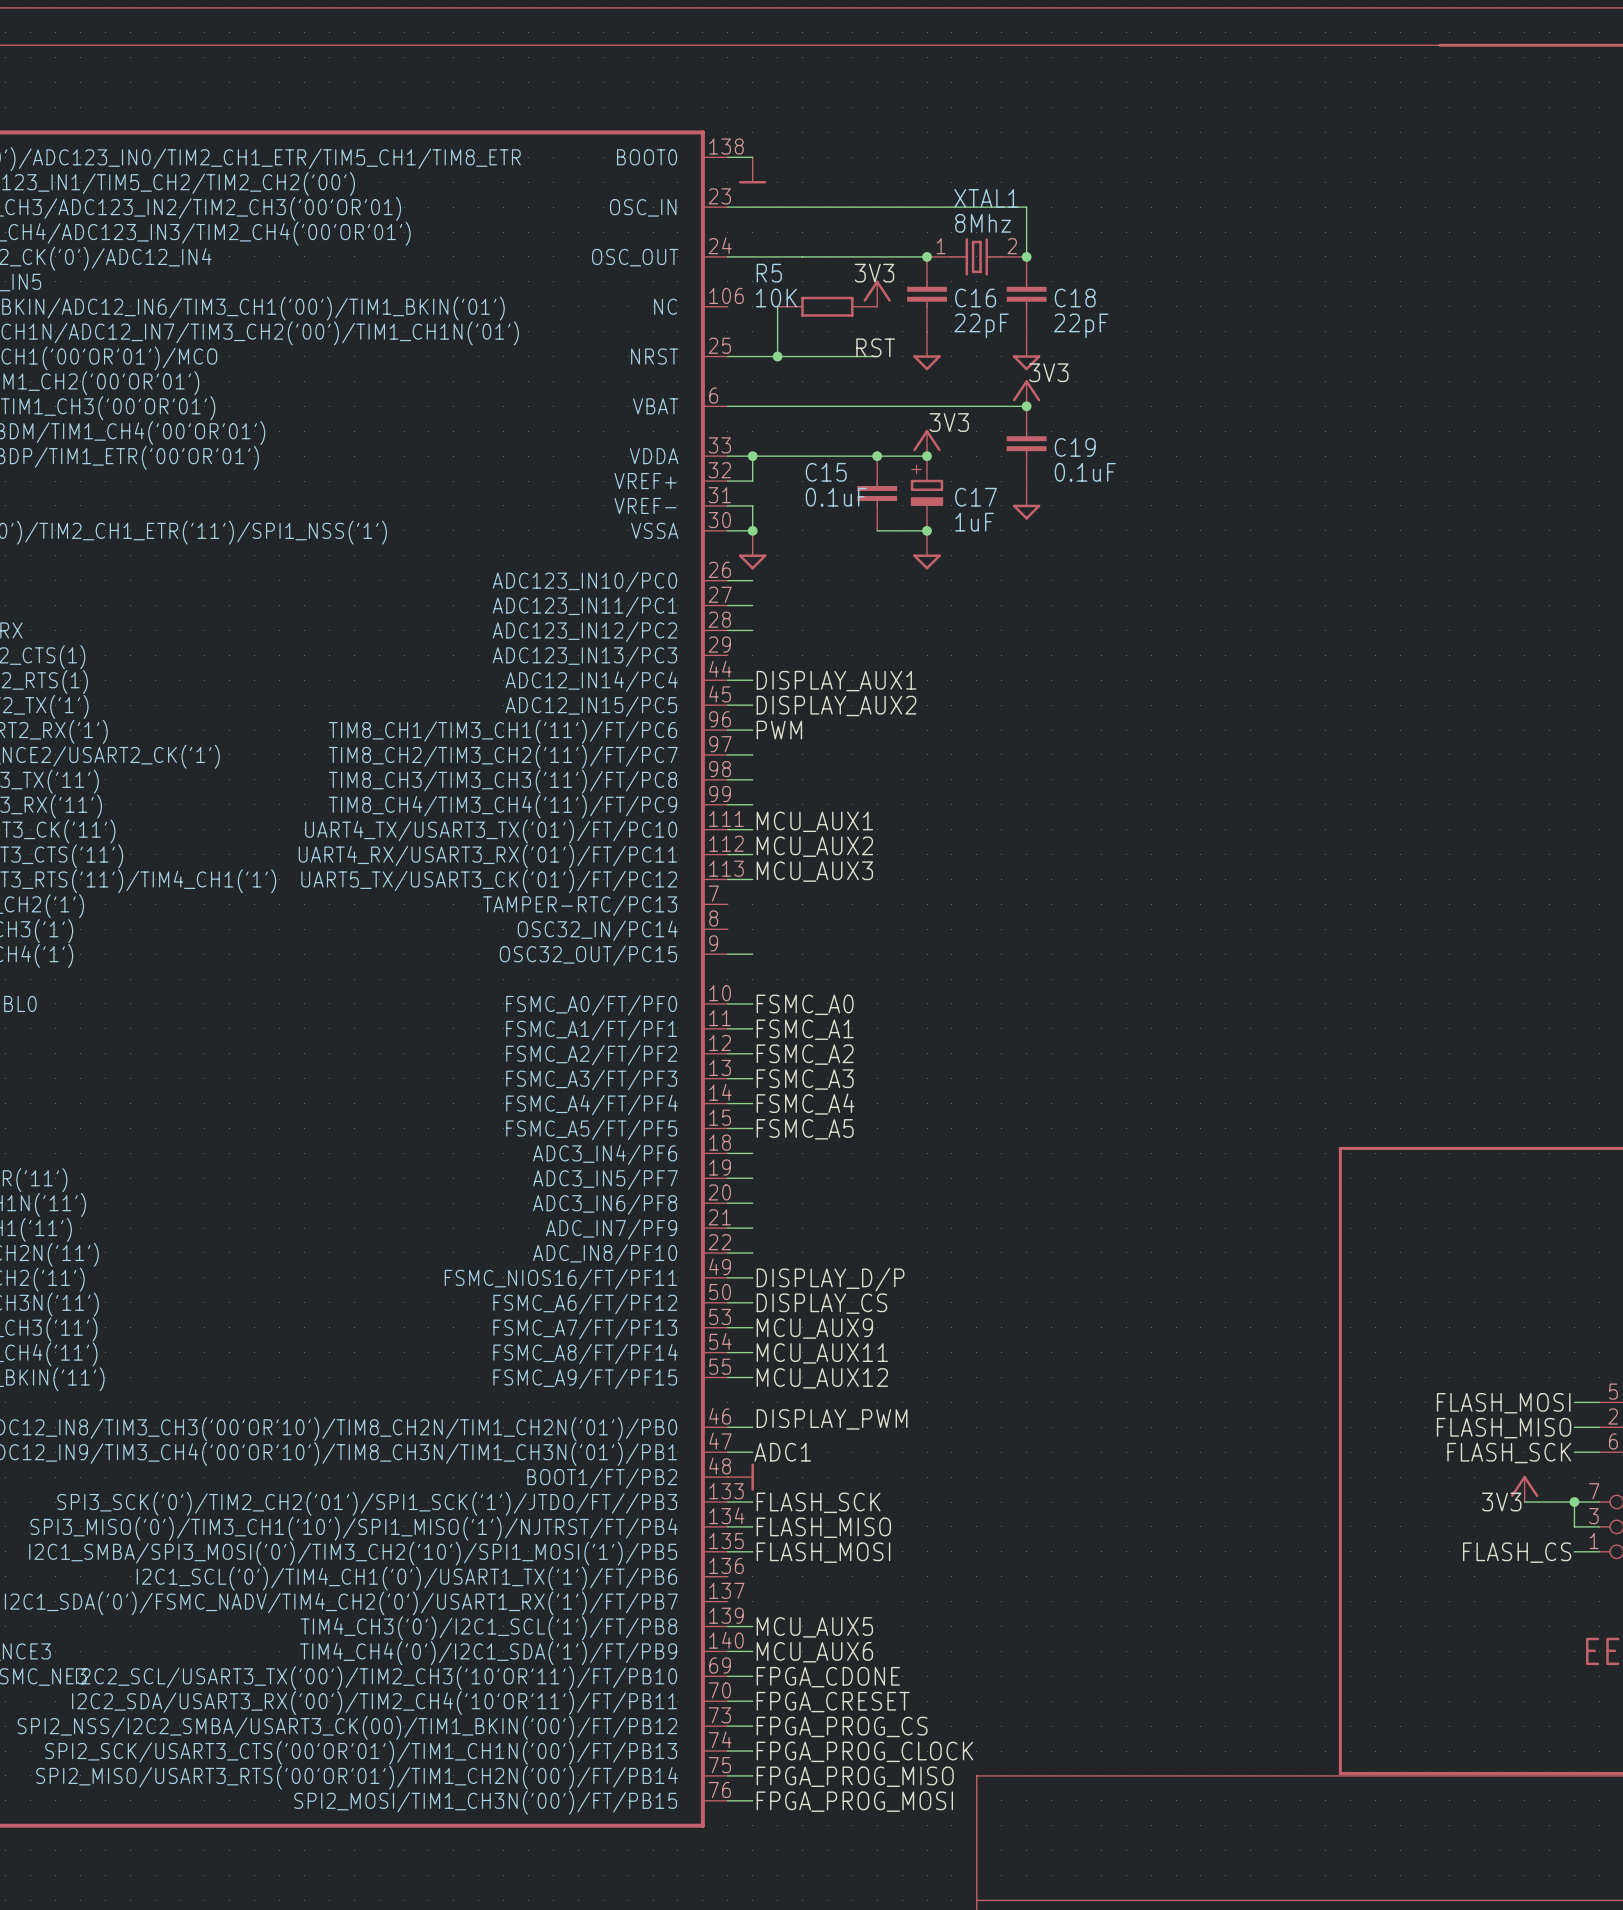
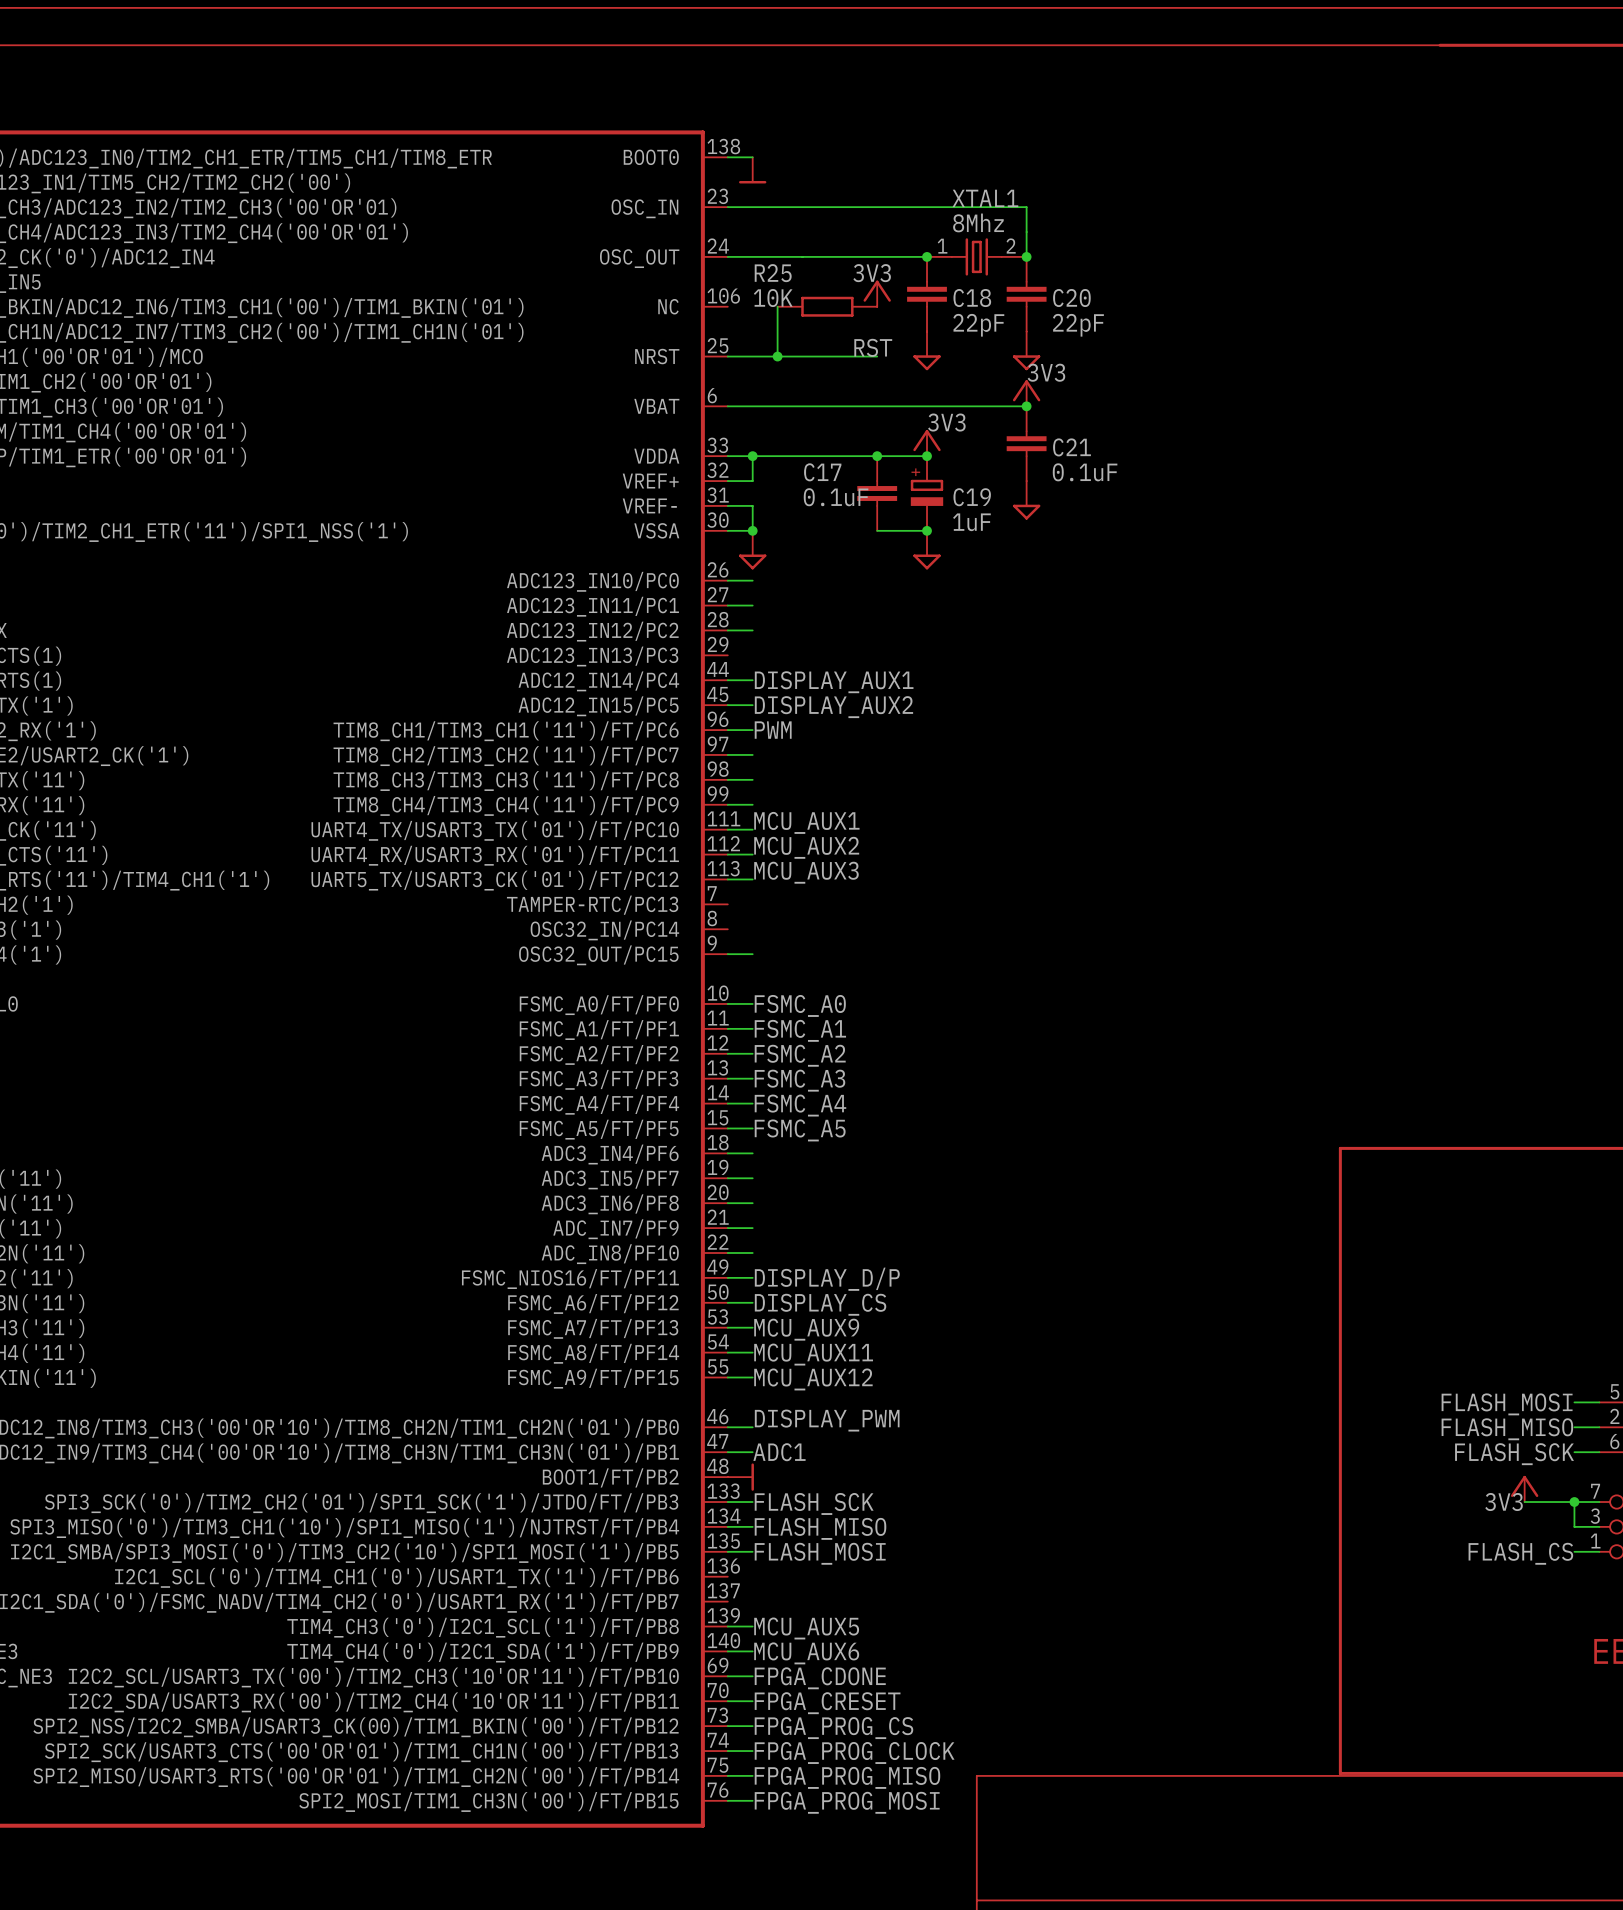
R5 name: R5 (769, 273) -> R25 (773, 273)
C16 name: C16 (975, 298) -> C18 (972, 298)
C18 name: C18 (1075, 298) -> C20 (1071, 298)
C19 name: C19 (1075, 447) -> C21 (1072, 447)
C15 name: C15 (826, 472) -> C17 (822, 472)
C17 name: C17 (975, 497) -> C19 (972, 497)

